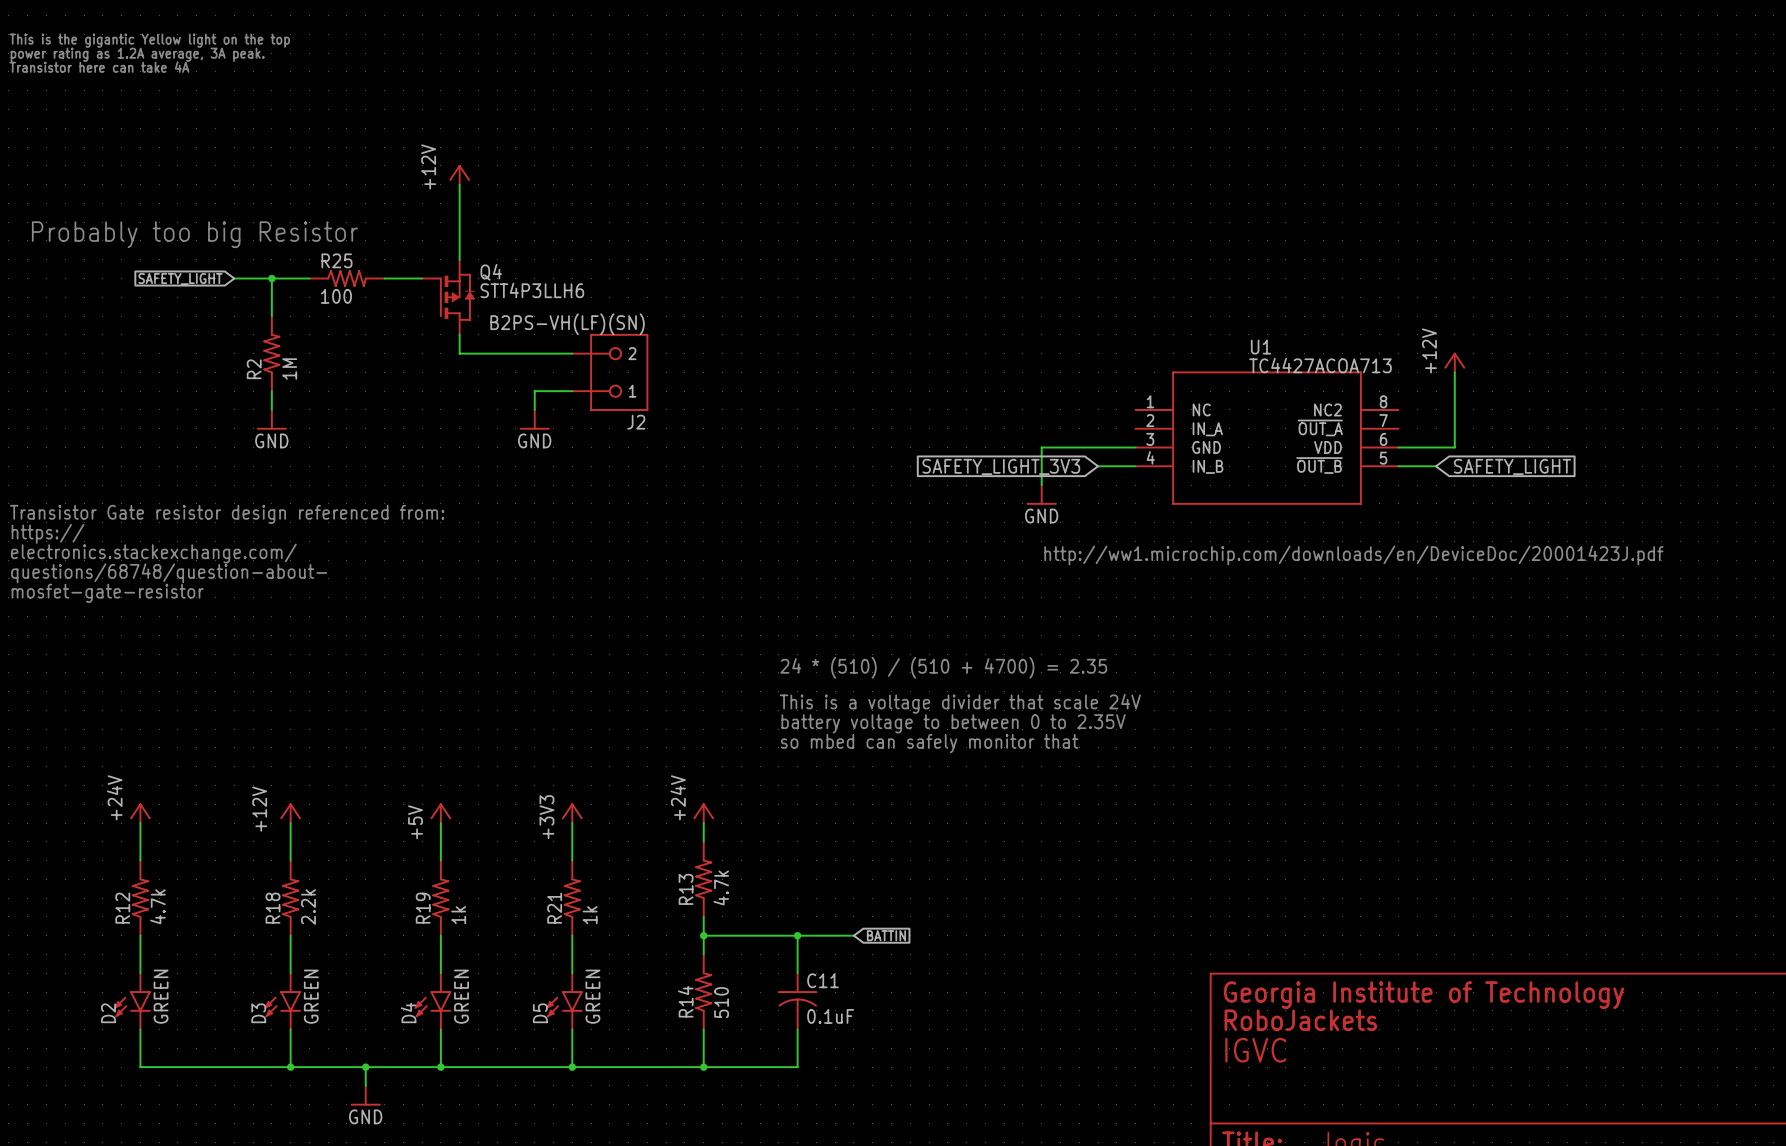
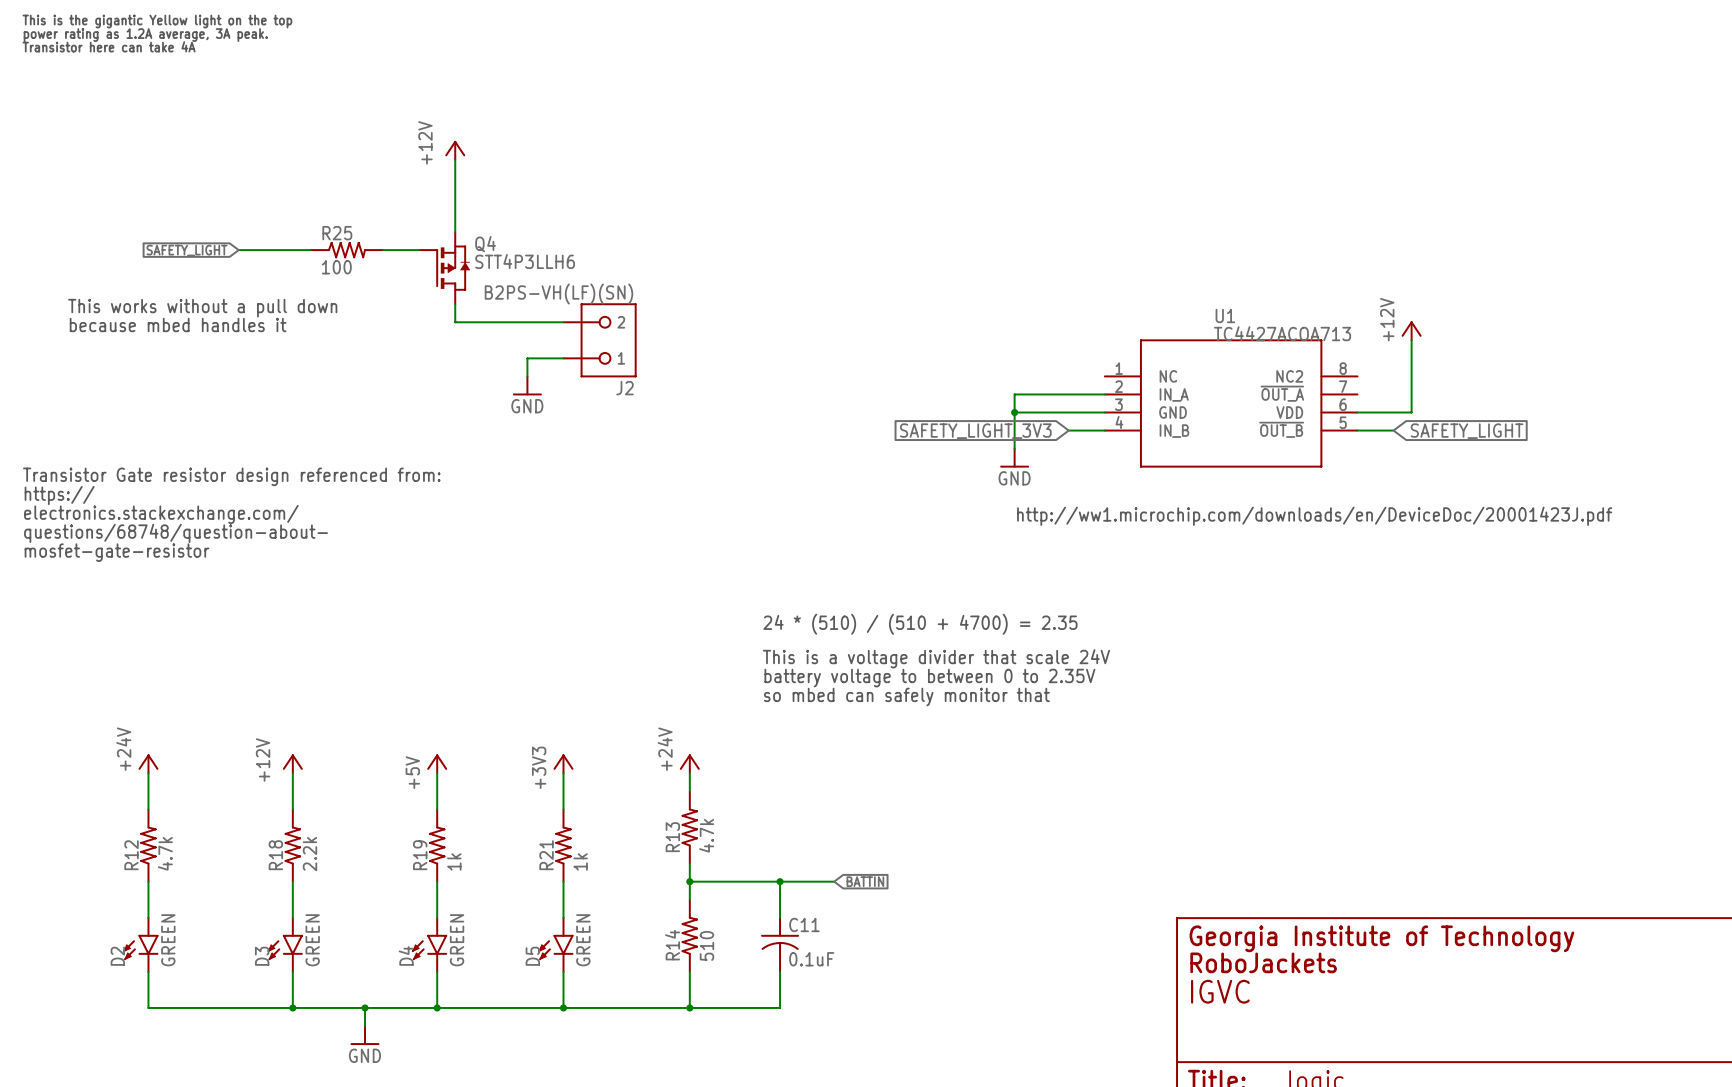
text: Probably too big Resistor (194, 234) -> none
wire: (271, 278) (271, 316) -> none
junction: (271, 278) -> none
text: none -> This works without a pull down (202, 308)
R2: 1M (271, 353) -> none
text: none -> because mbed handles it (178, 324)
wire: (271, 391) (271, 409) -> none
power symbol: GND (271, 419) -> none
wire: none -> (1104, 394) (1014, 394) (1014, 412)
junction: none -> (1014, 412)

